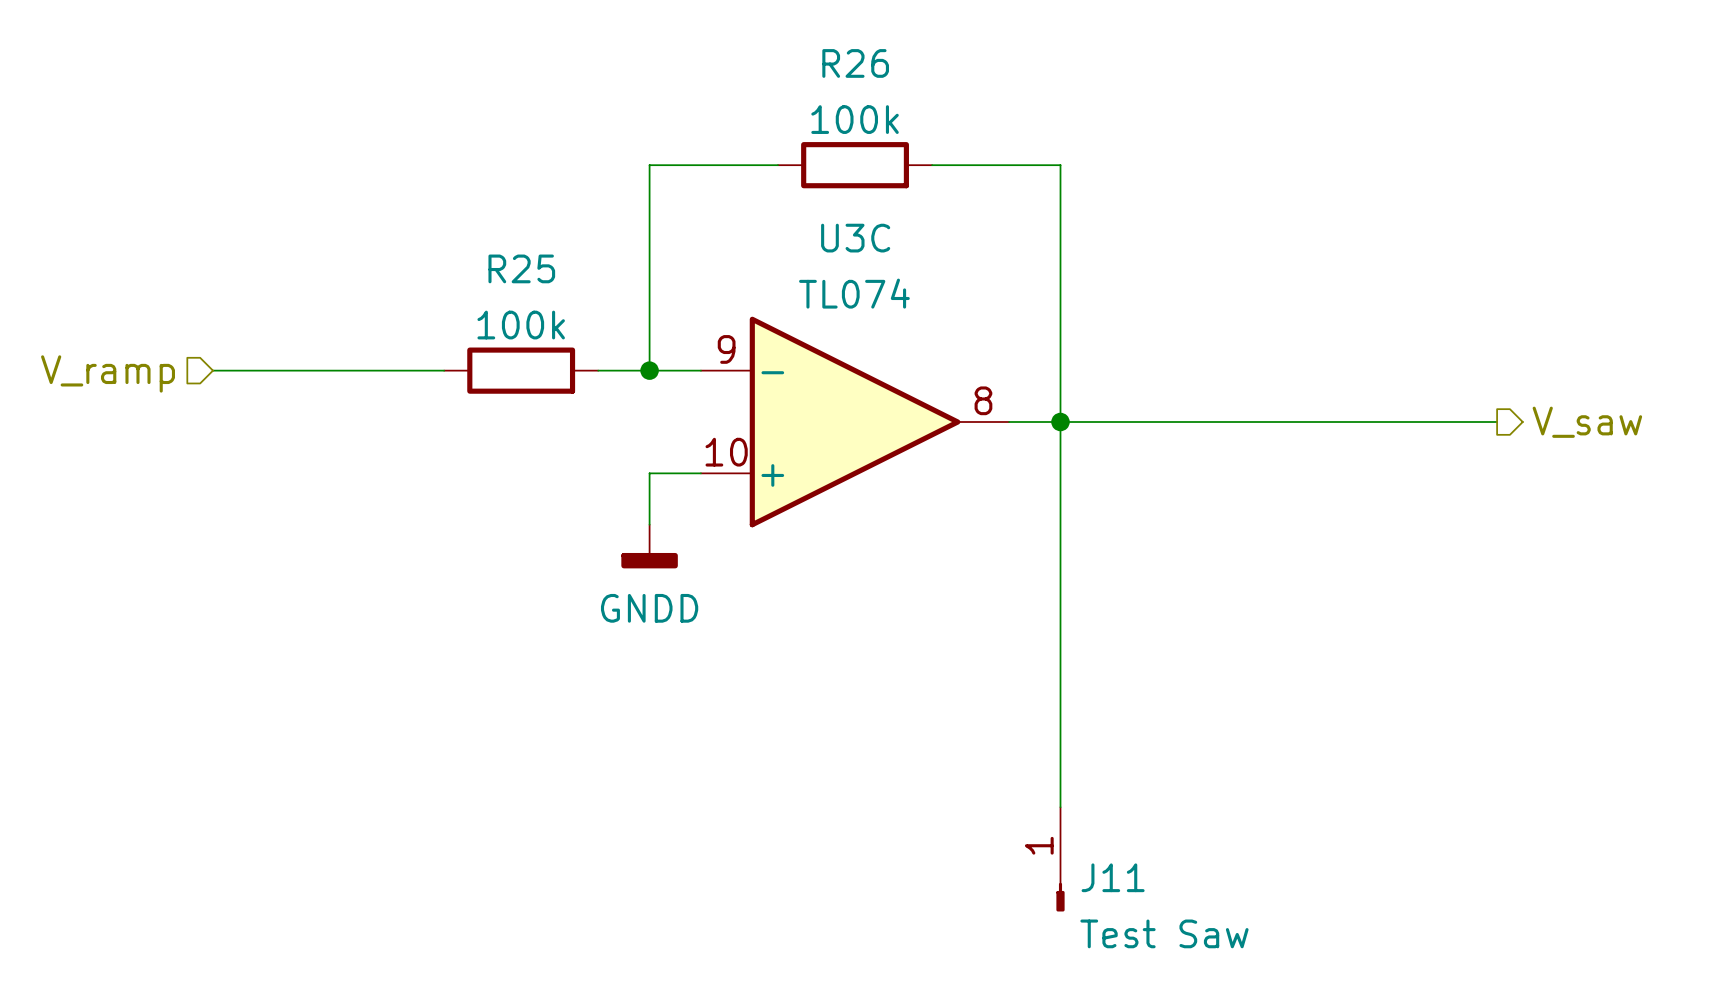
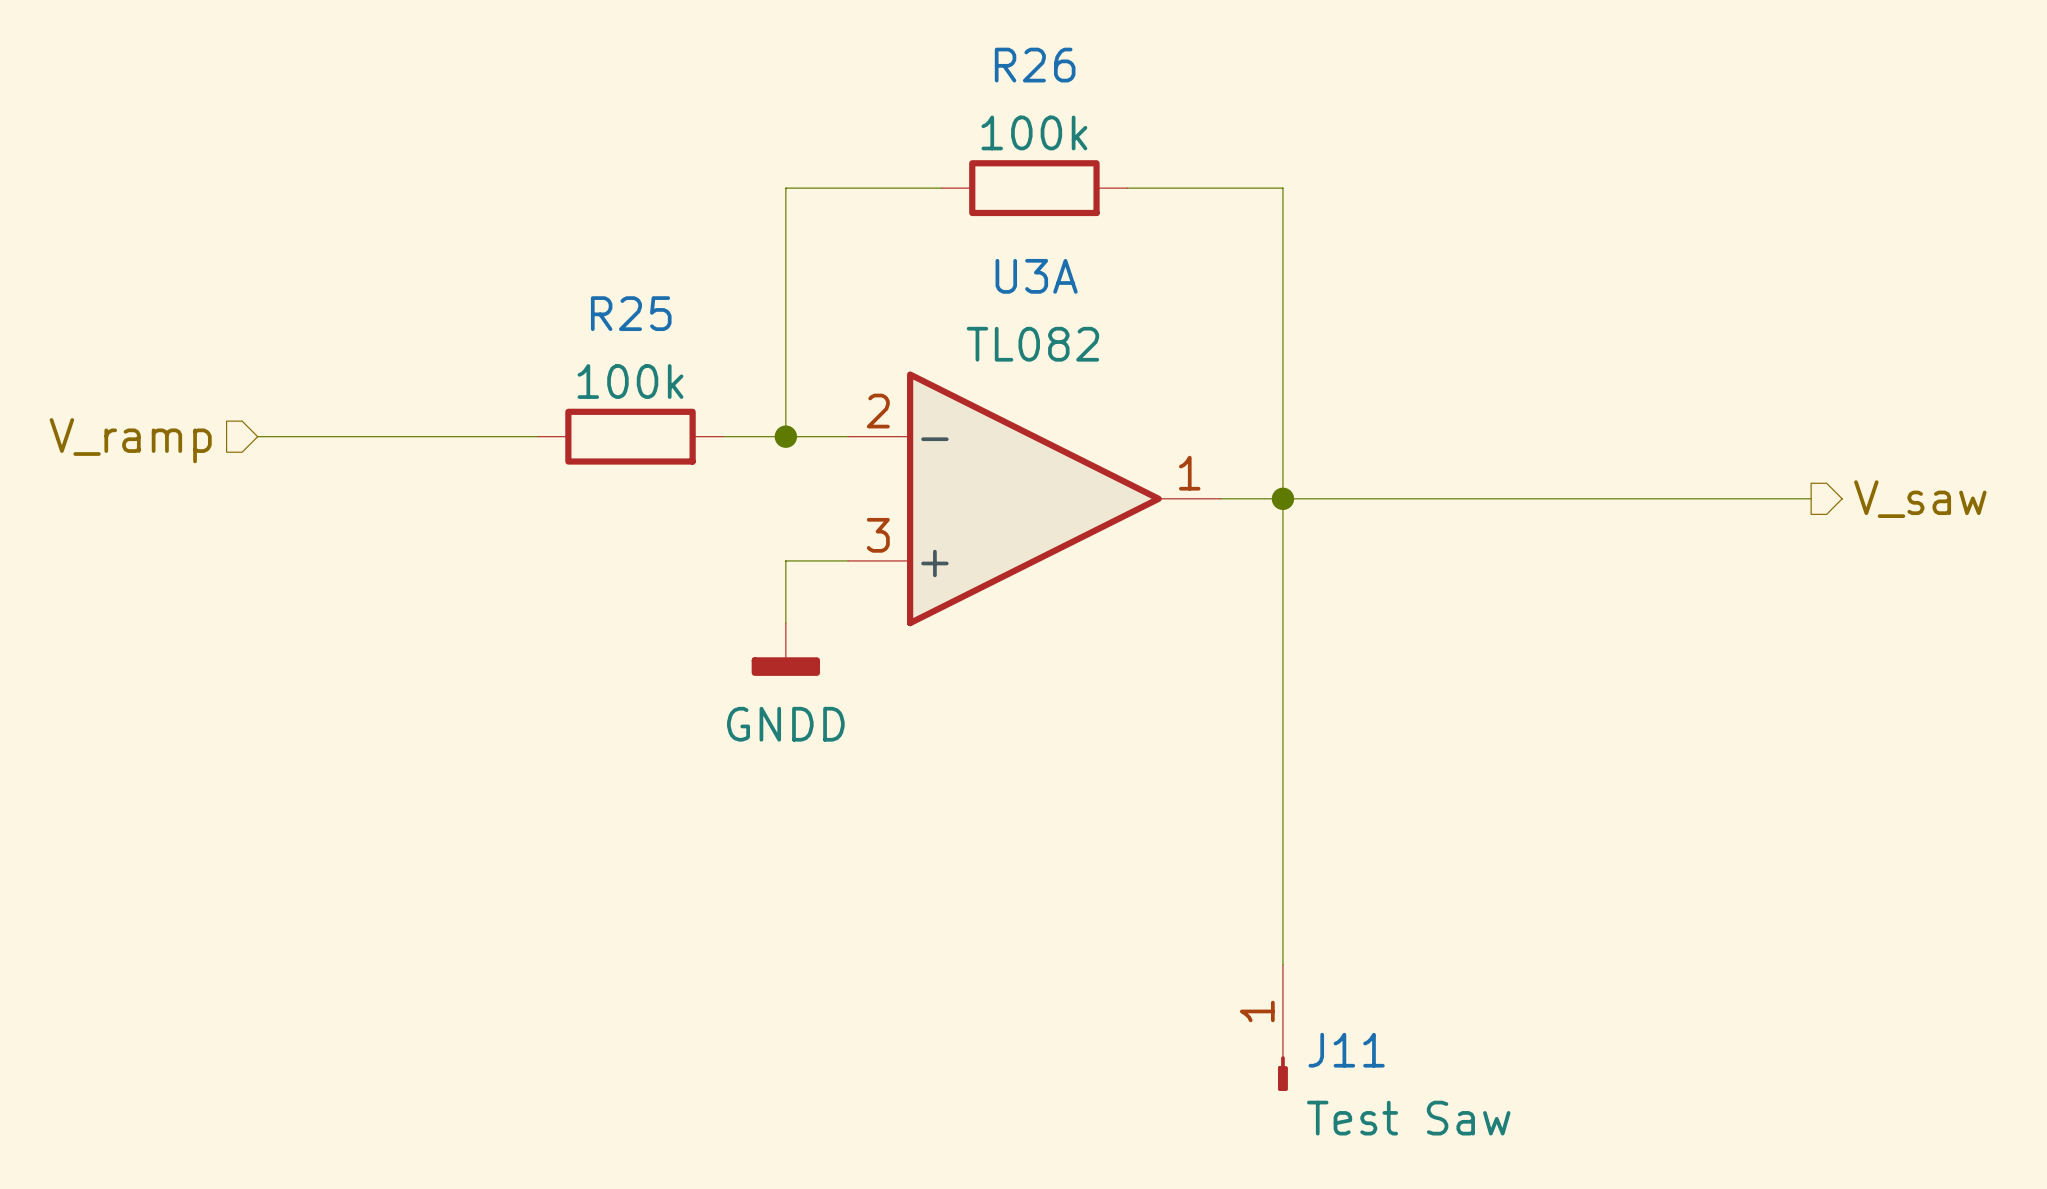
U3C name: U3C (855, 238) -> U3A (1036, 276)
U3C value: TL074 (854, 293) -> TL082 (1032, 344)
U3C pin number: 9 (726, 349) -> 2 (878, 411)
U3C pin number: 8 (983, 400) -> 1 (1189, 473)
U3C pin number: 10 (726, 452) -> 3 (878, 535)

